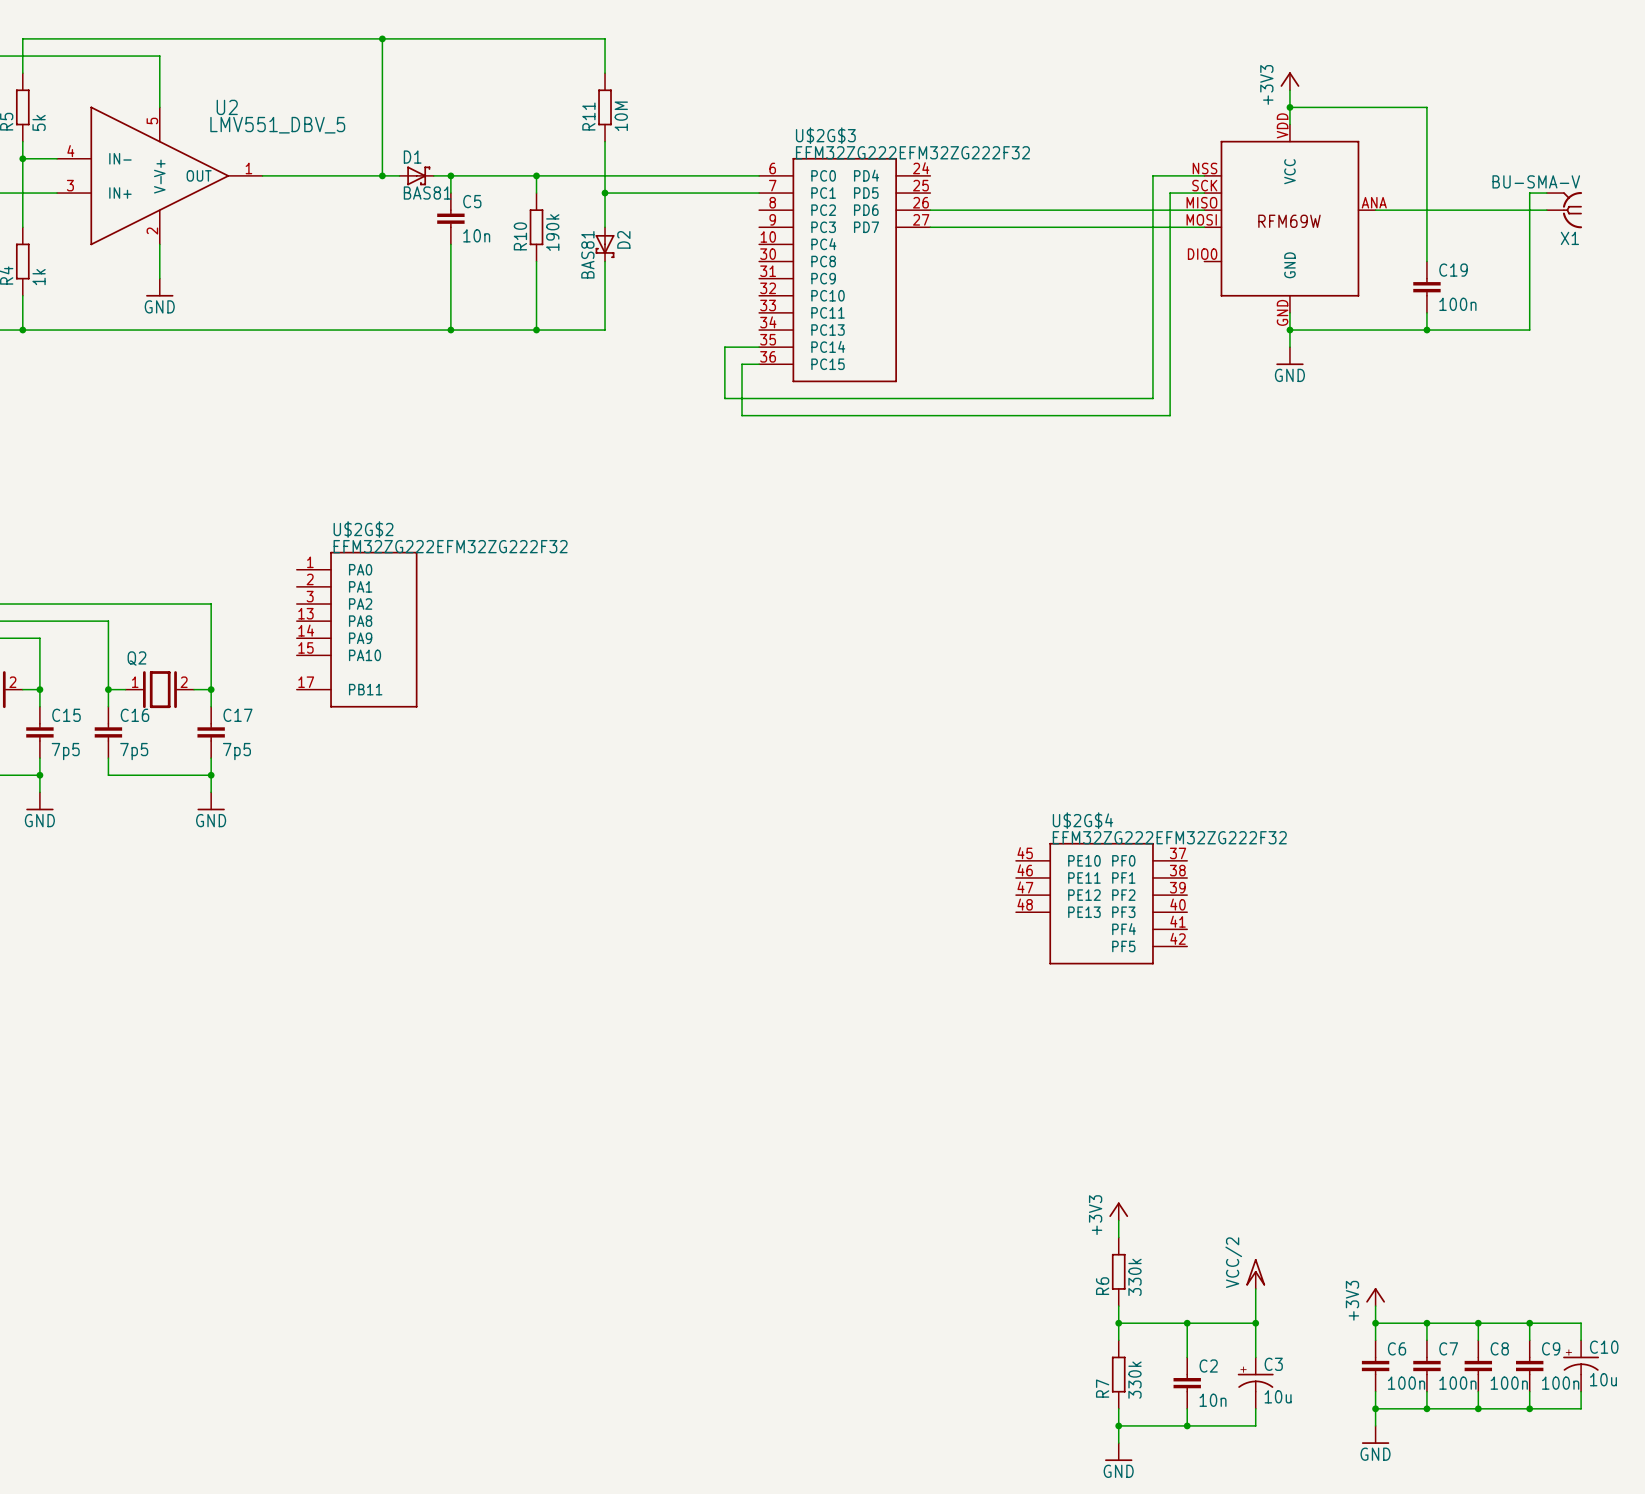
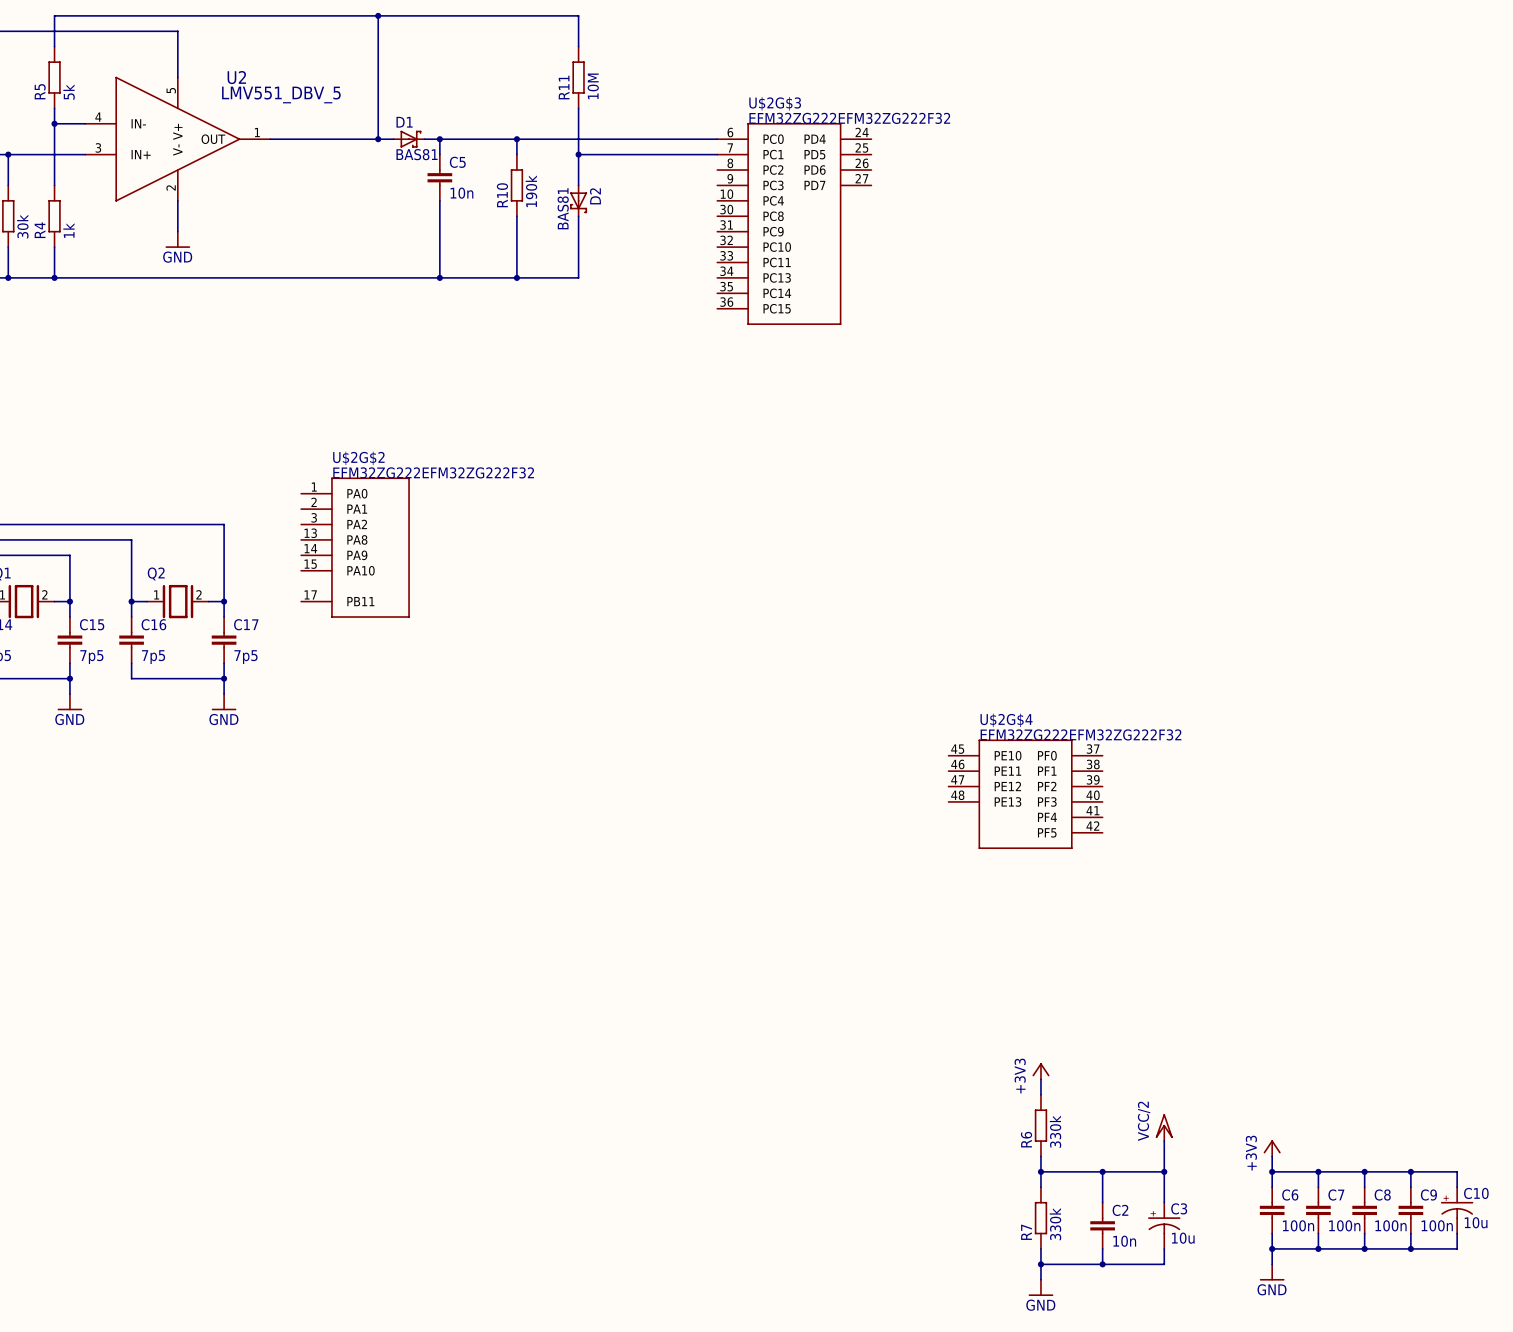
power symbol: +3V3 (1289, 81) -> none
wire: (1289, 90) (1289, 124) -> none
wire: (1289, 107) (1426, 107) (1426, 261) -> none
junction: (1289, 107) -> none
wire: (1204, 175) (1152, 175) (1152, 398) (724, 398) (724, 347) (759, 347) -> none
wire: (1204, 193) (1170, 193) (1170, 415) (742, 415) (742, 364) (759, 364) -> none
wire: (1546, 193) (1529, 193) (1529, 330) (1289, 330) -> none
wire: (930, 210) (1204, 210) -> none
wire: (1375, 210) (1546, 210) -> none
X1: BU-SMA-V (1564, 210) -> none
part: (1289, 218) -> none
wire: (930, 227) (1204, 227) -> none
C19: 100n (1426, 287) -> none
wire: (1289, 312) (1289, 347) -> none
wire: (1426, 312) (1426, 330) -> none
junction: (1289, 330) -> none
junction: (1426, 330) -> none
power symbol: GND (1289, 356) -> none

